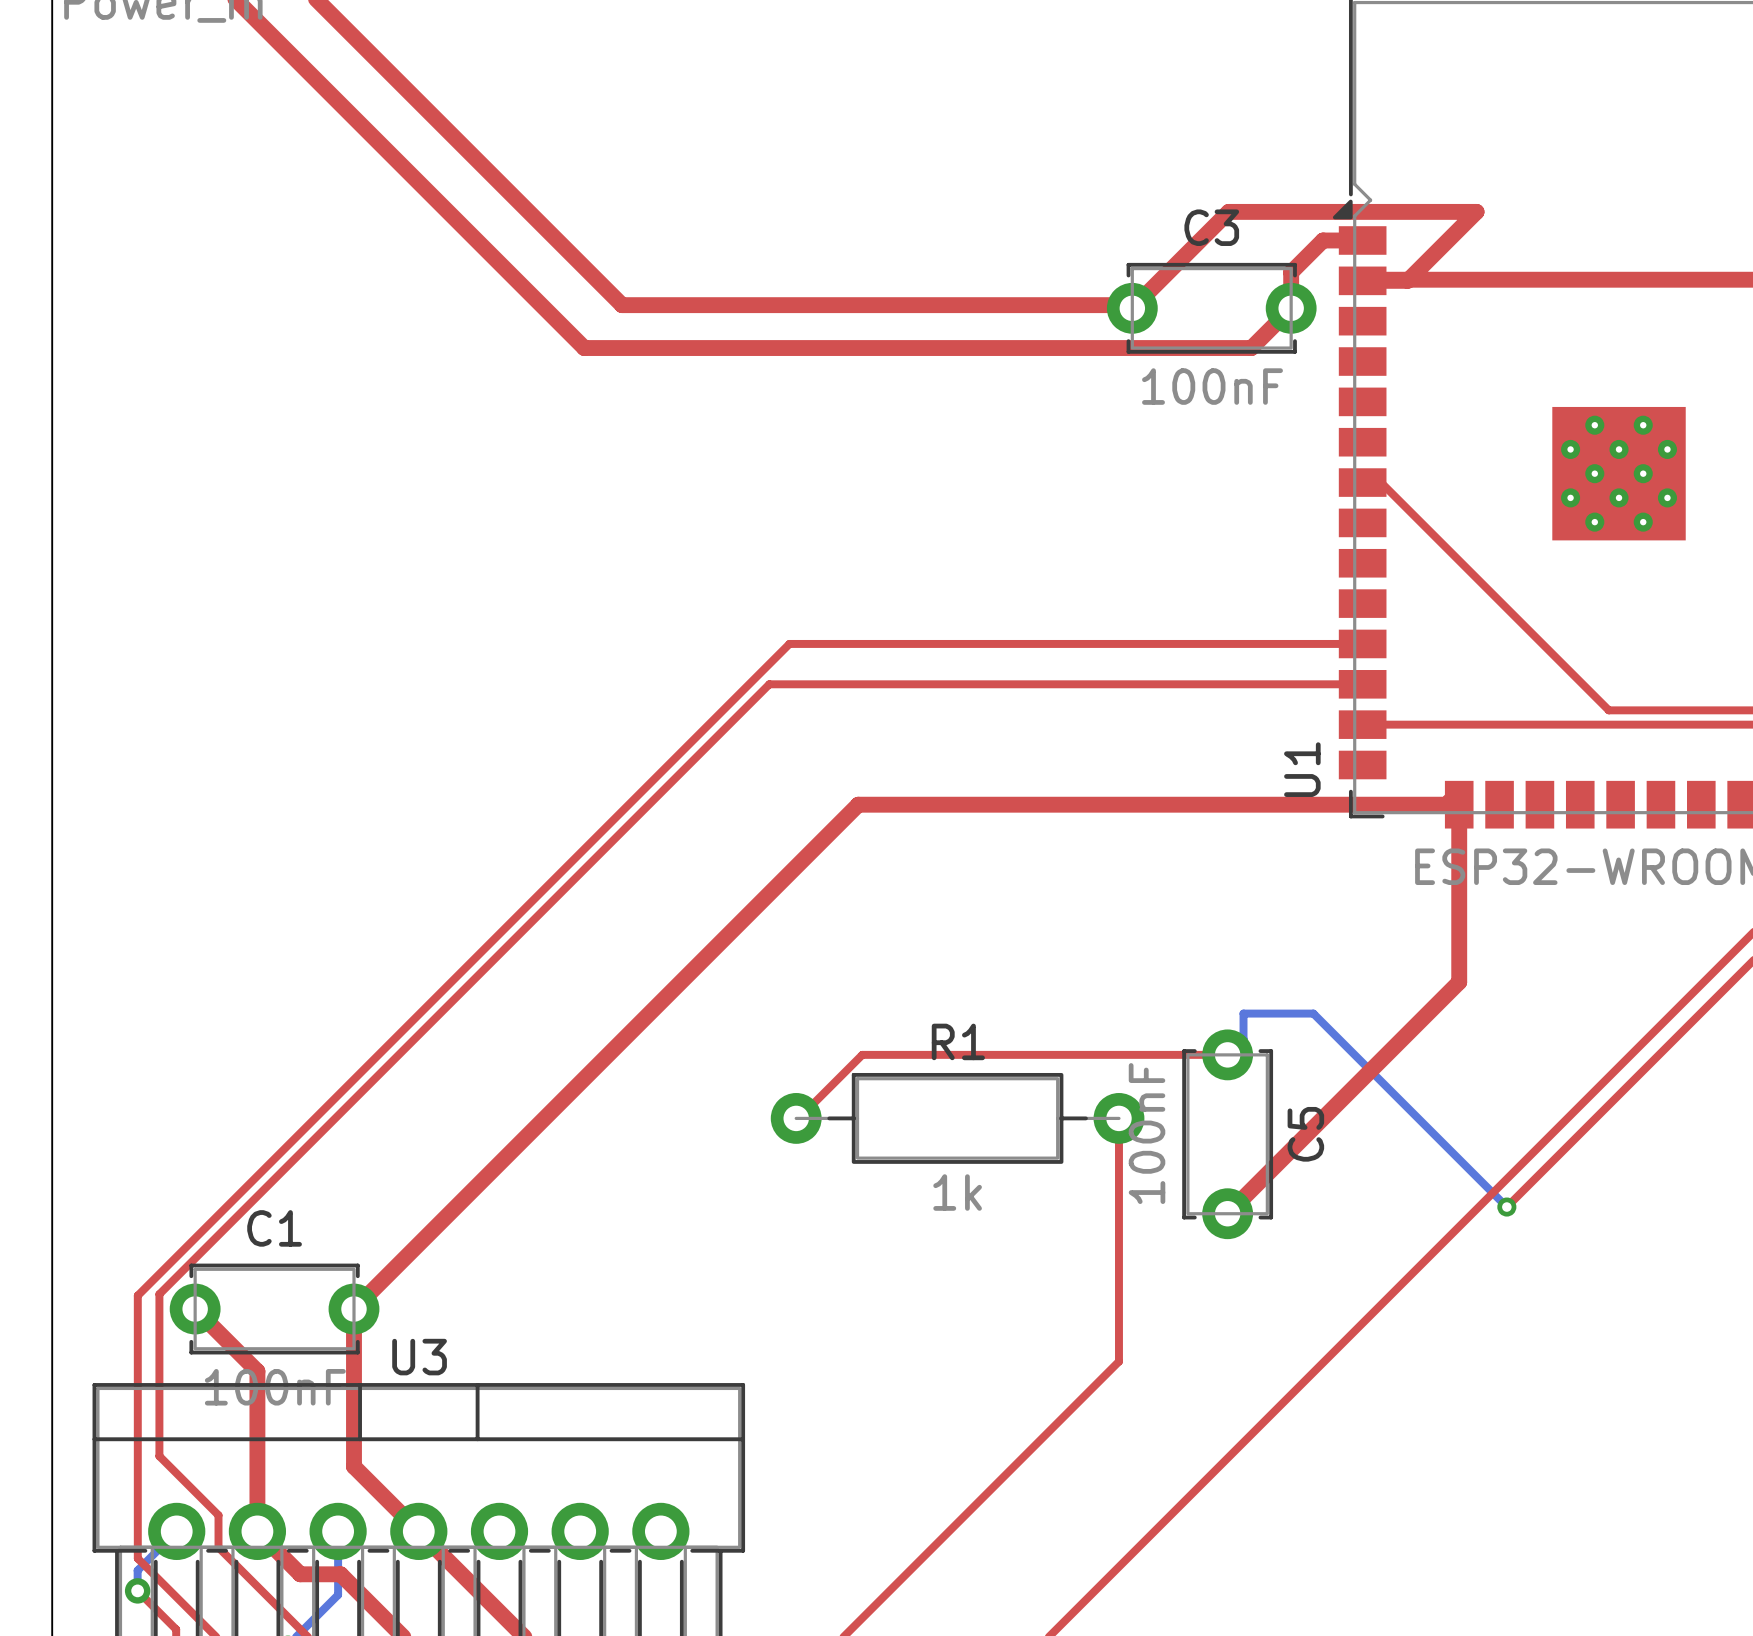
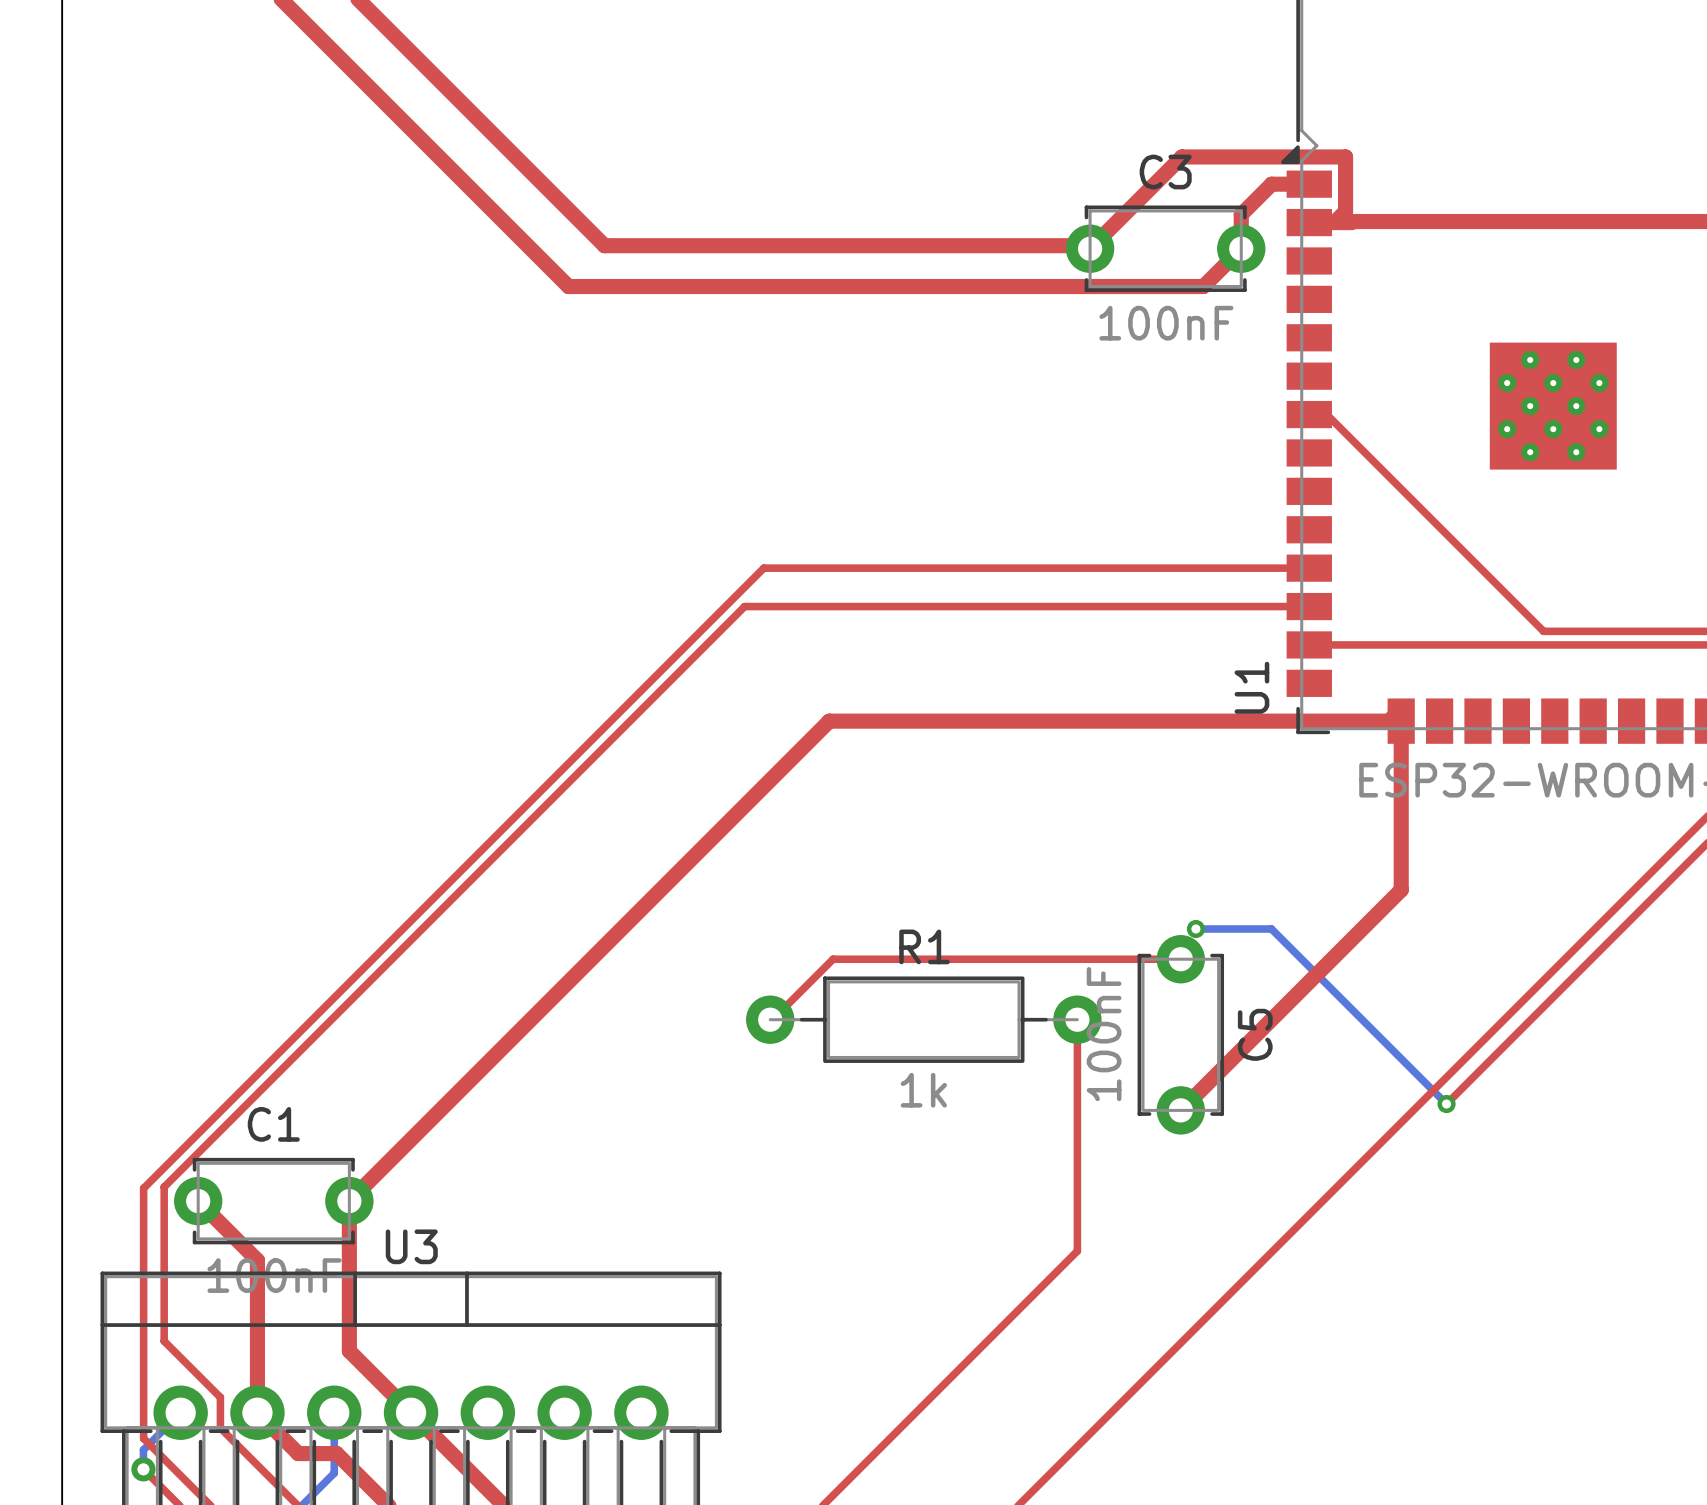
top track: (1400, 211) (1476, 211) (1407, 280) -> (1345, 156) (1345, 211) (1334, 222)
via: none -> (1195, 928)
bottom track: (1322, 1023) (1313, 1013) (1243, 1013) (1243, 1038) (1227, 1054) -> (1271, 928) (1195, 928)

